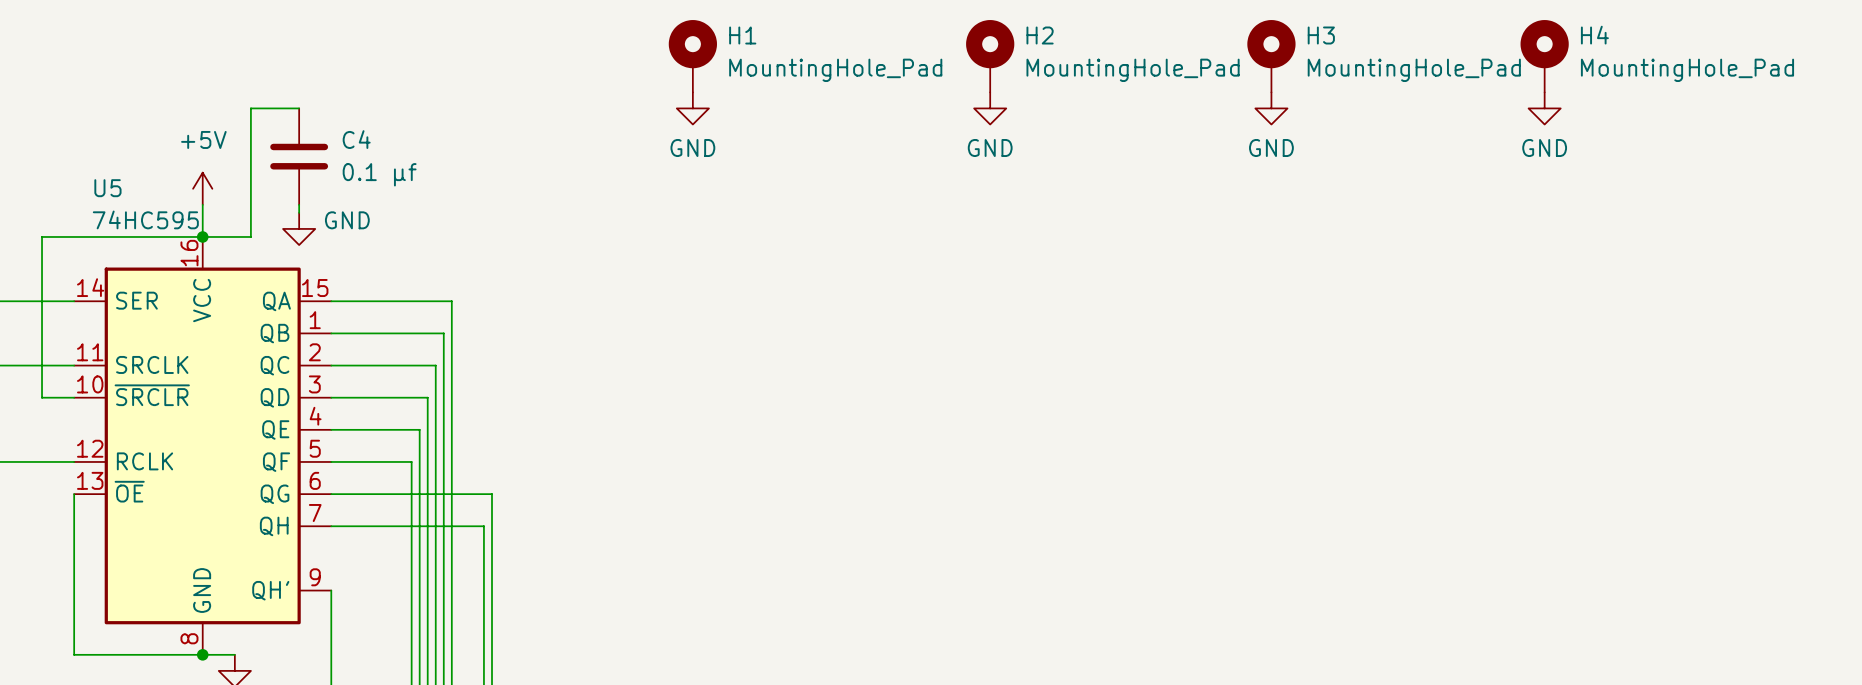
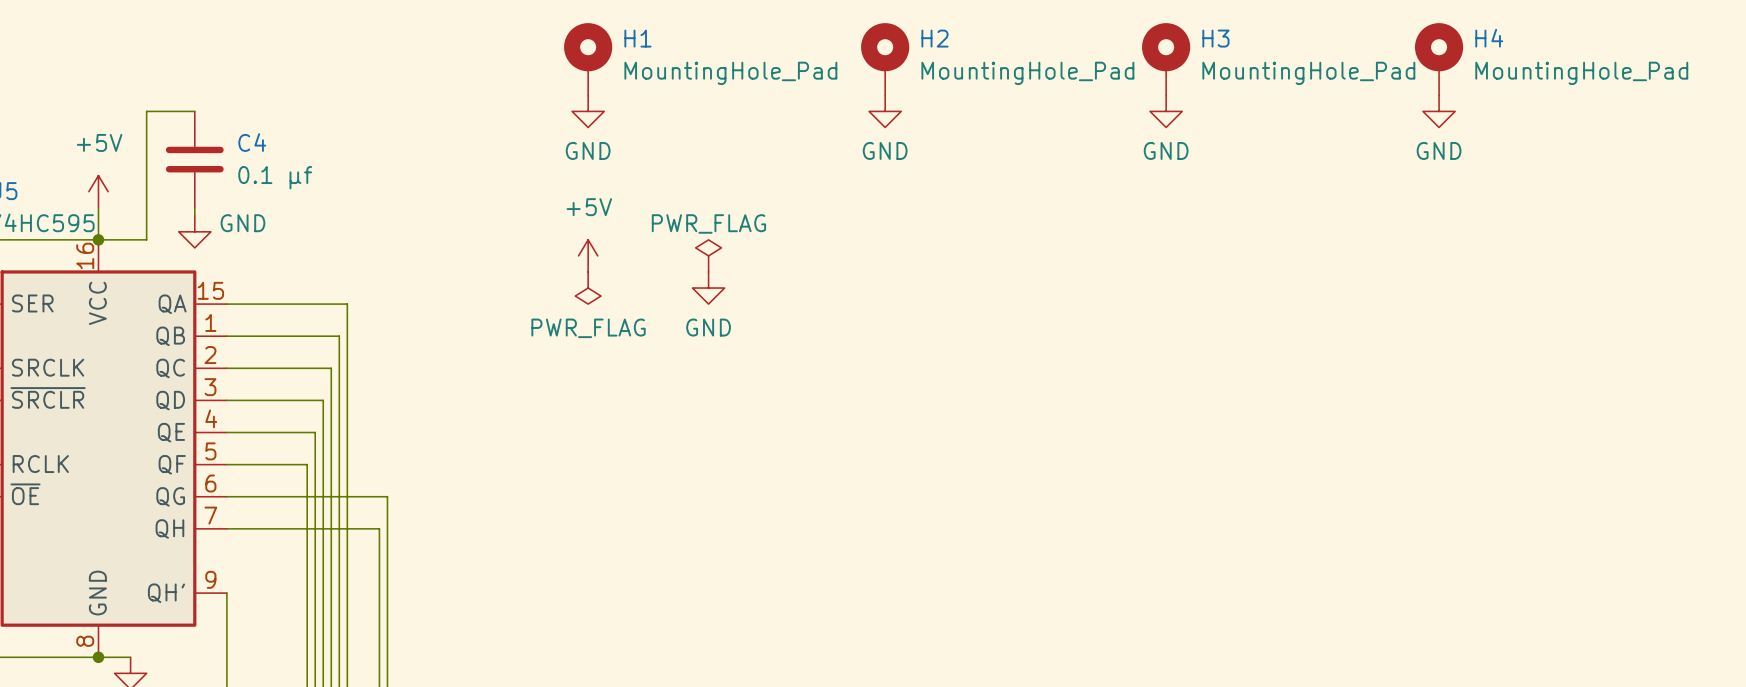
power symbol: none -> +5V (588, 255)
power symbol: none -> PWR_FLAG (708, 255)
power symbol: none -> PWR_FLAG (588, 288)
power symbol: none -> GND (708, 288)

